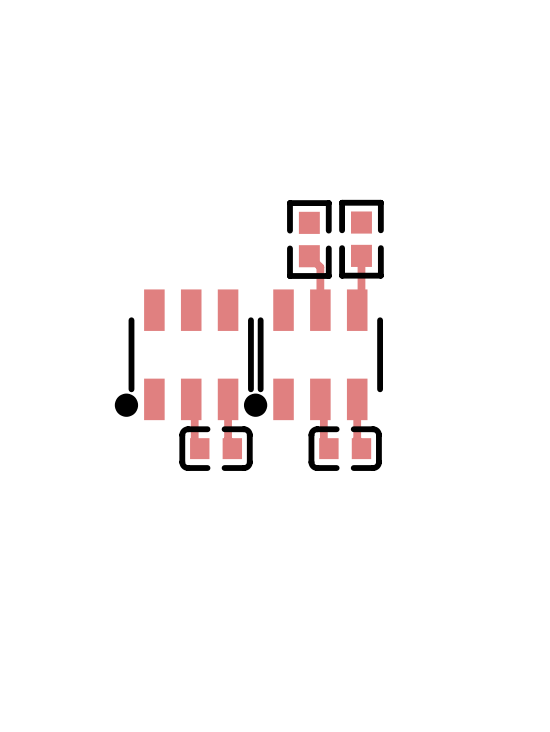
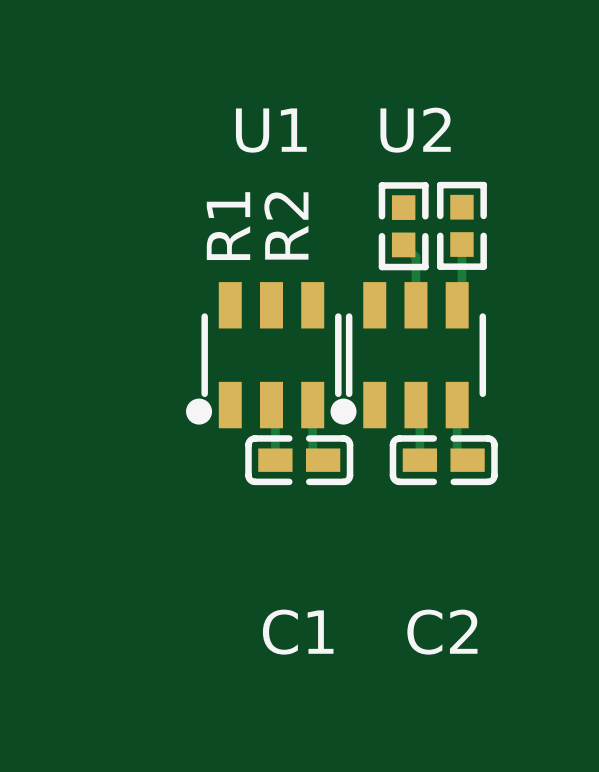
U1 name: none -> U1 (271, 130)
U2 name: none -> U2 (415, 130)
R1 name: none -> R1 (228, 226)
R2 name: none -> R2 (286, 225)
part: (216, 448) -> none
C1: none -> (299, 460)
part: (345, 448) -> none
C2: none -> (443, 460)

